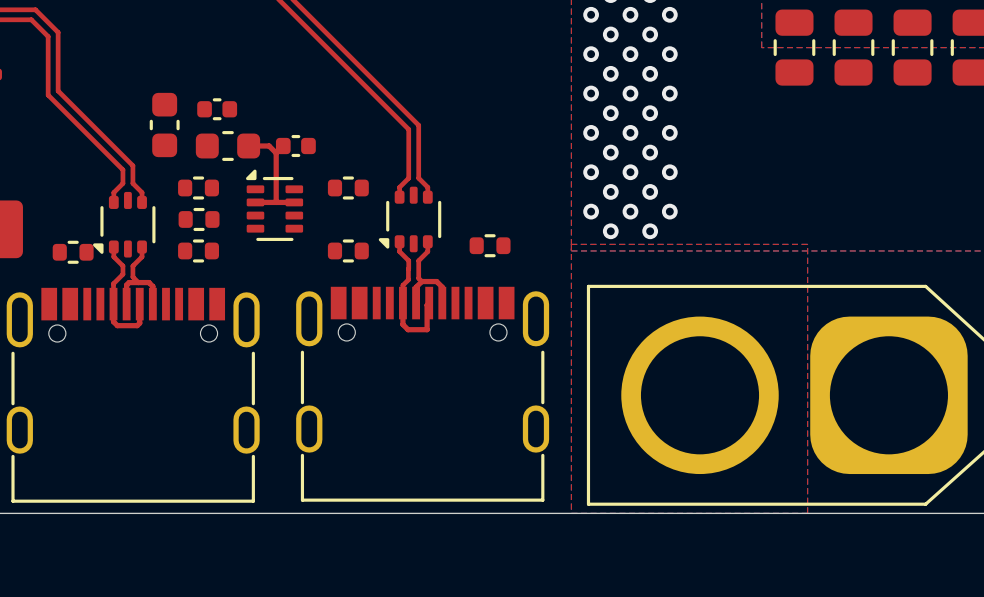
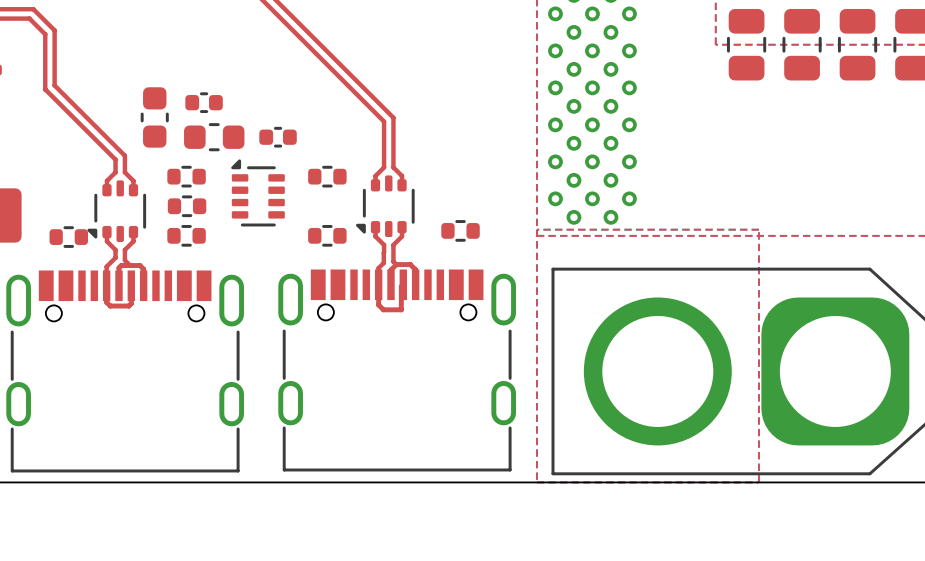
top track: (248, 146) (269, 146) (276, 153) -> none
top track: (276, 153) (276, 202) -> none
top track: (255, 202) (294, 202) -> none

